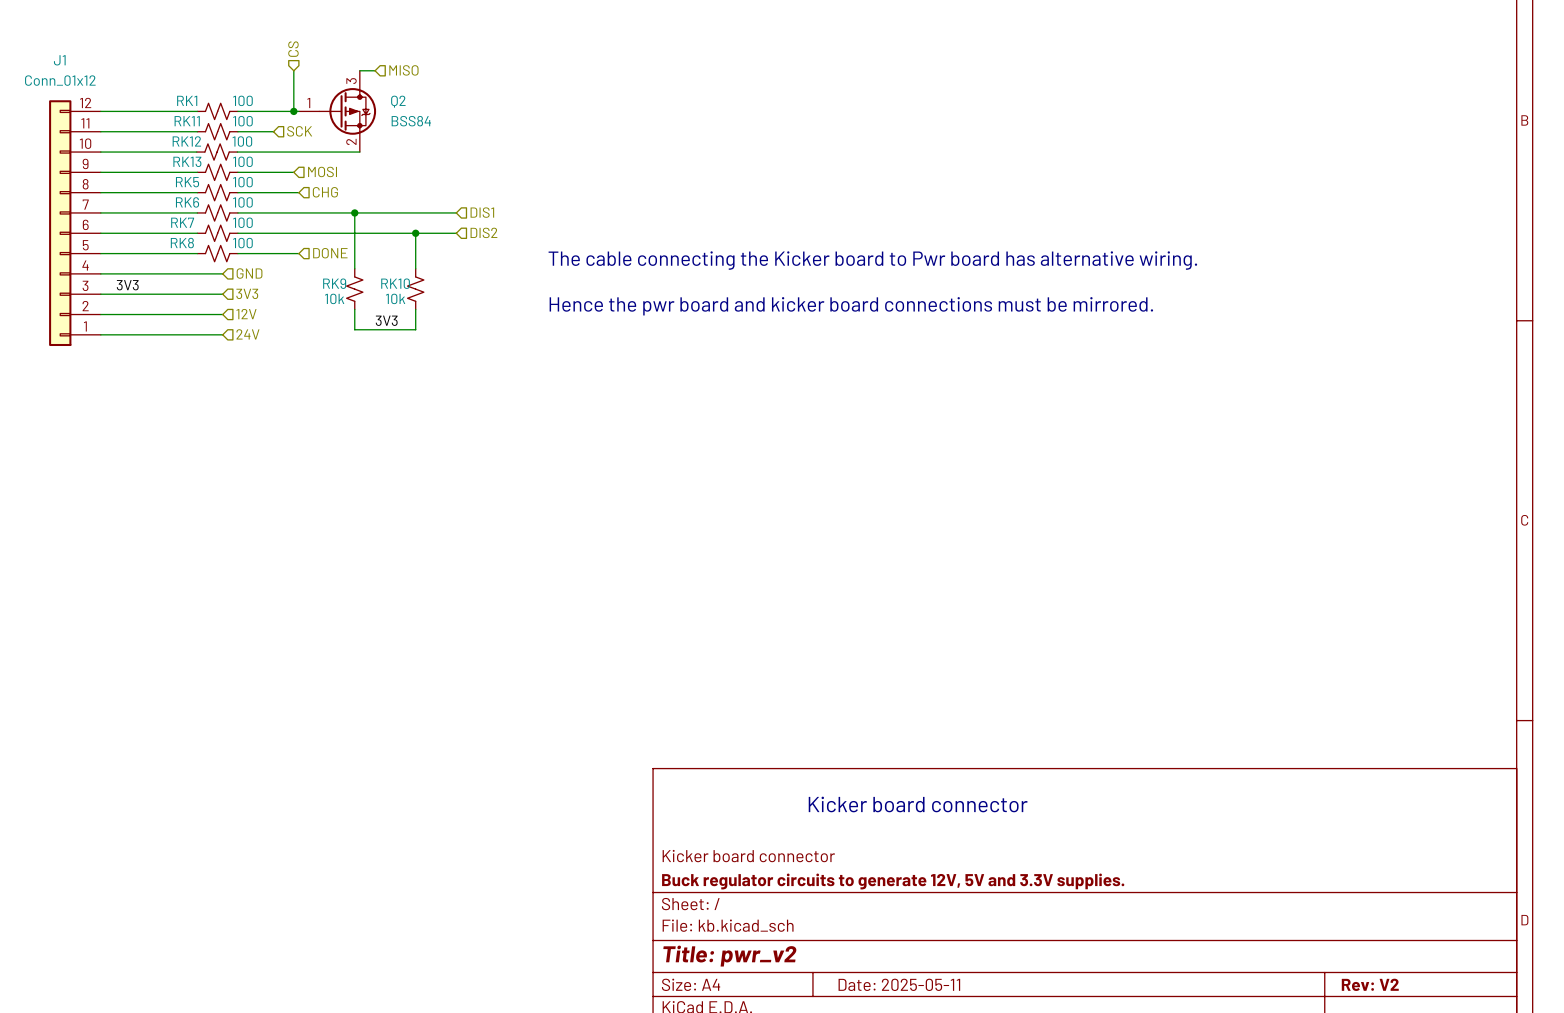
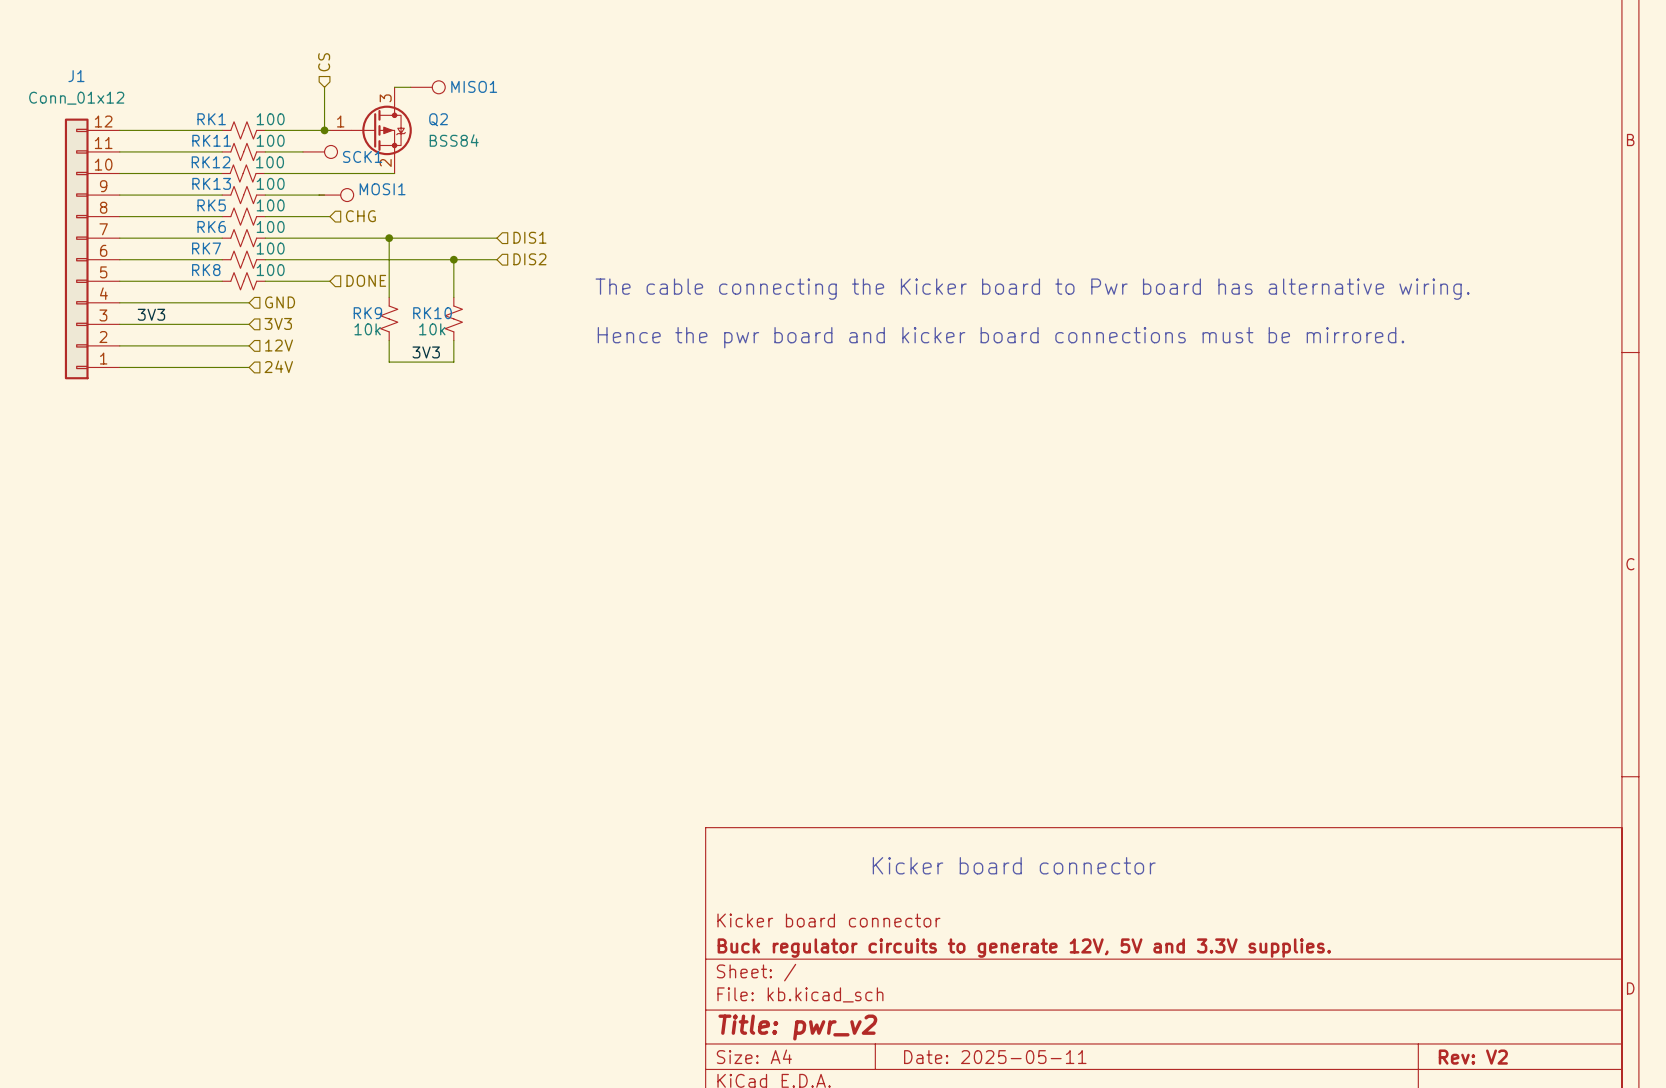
MISO1: none -> (427, 87)
hierarchical label: MISO (403, 70) -> none
SCK1: none -> (320, 151)
hierarchical label: SCK (299, 131) -> none
hierarchical label: MOSI (322, 171) -> none
MOSI1: none -> (336, 195)

